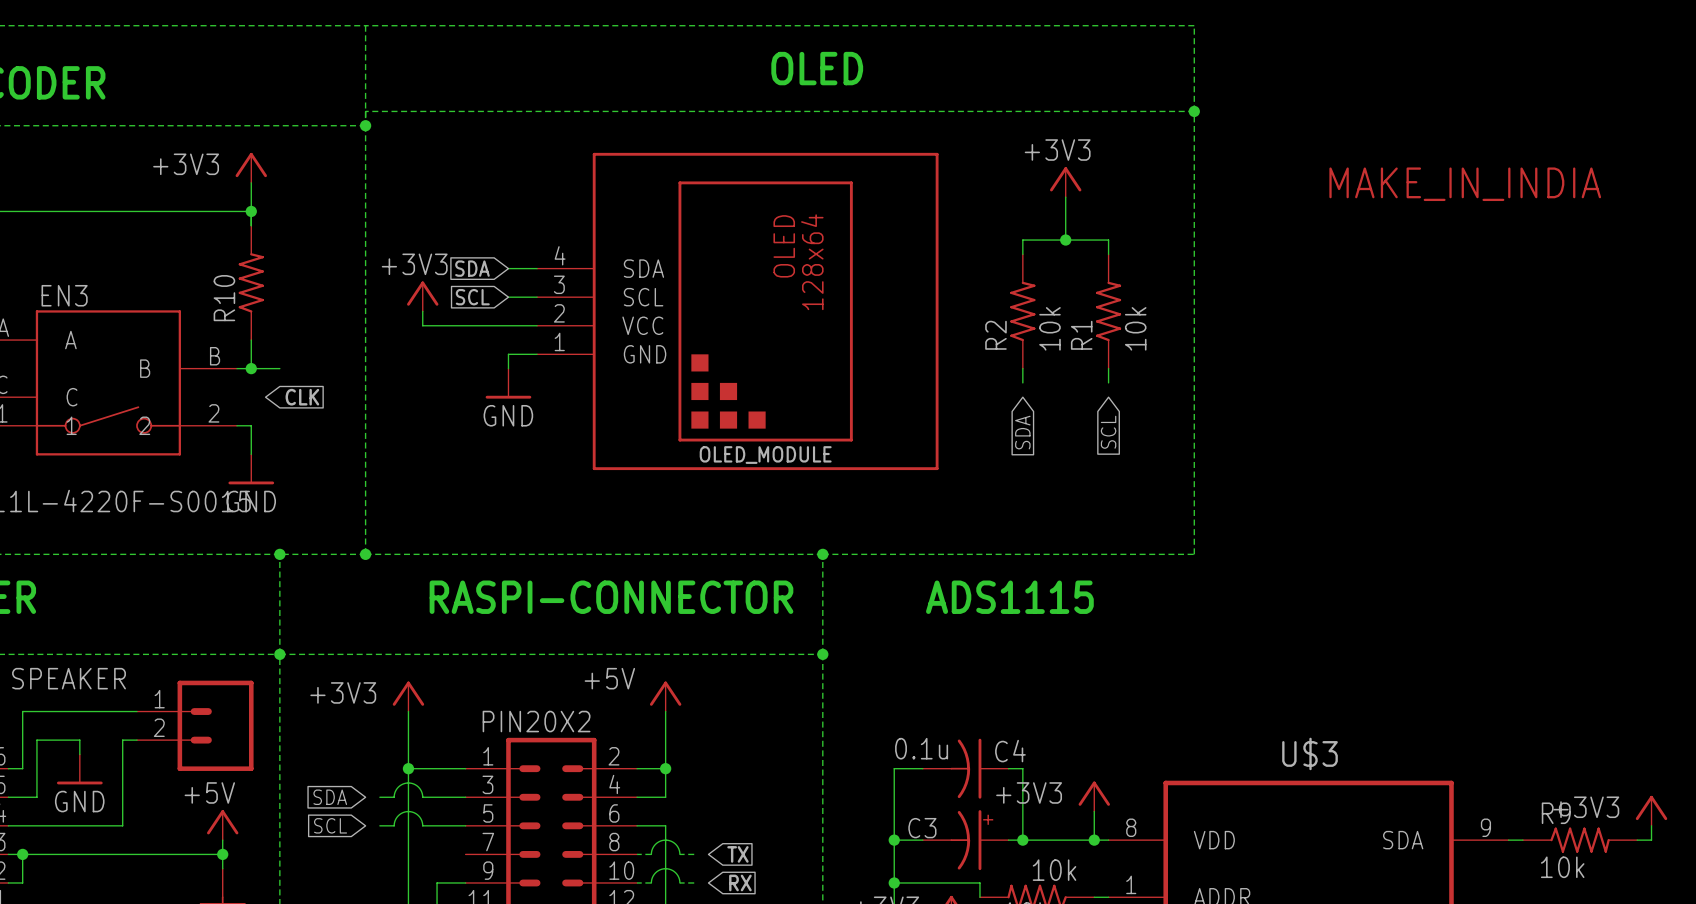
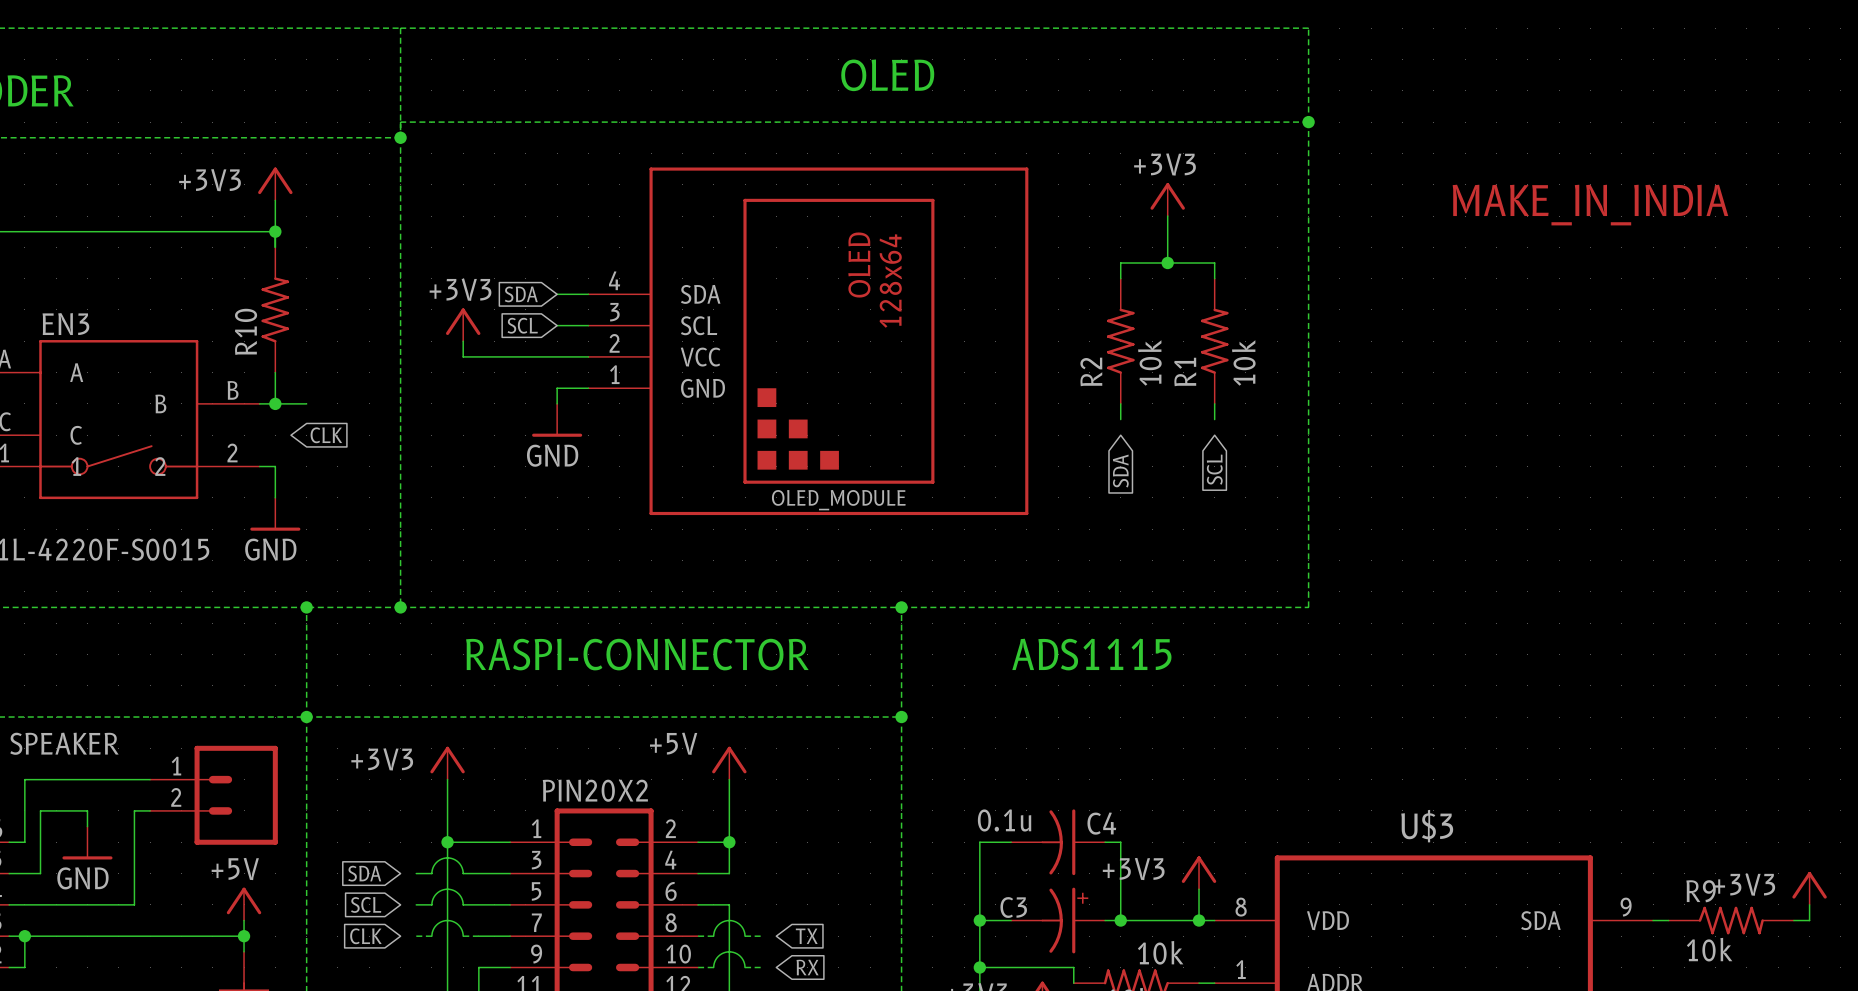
global label: none -> CLK (365, 936)
wire: none -> (416, 936) (431, 936) (436, 925) (447, 920) (458, 925) (463, 936) (510, 936)

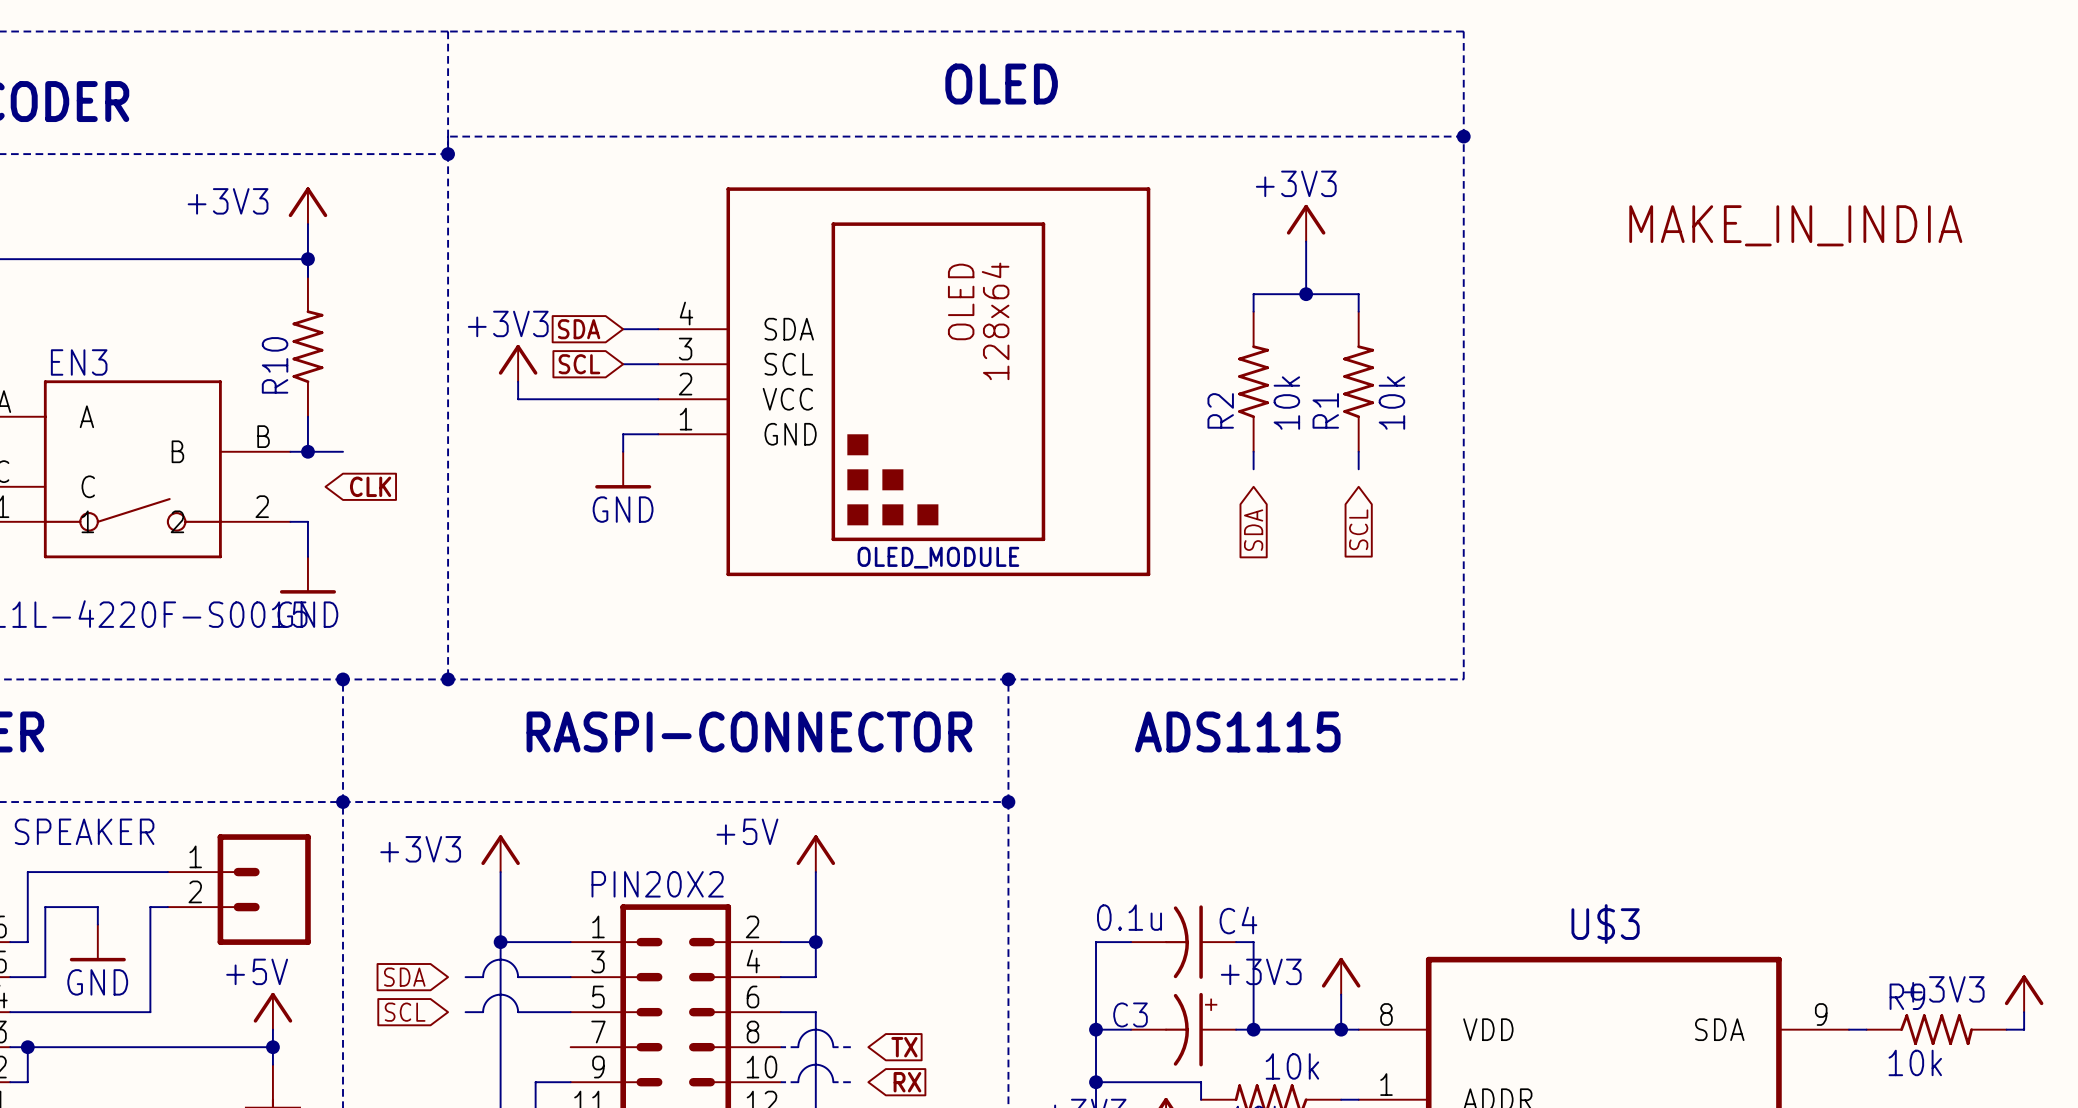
global label: CLK (365, 936) -> none
wire: (416, 936) (431, 936) (436, 925) (447, 920) (458, 925) (463, 936) (510, 936) -> none

